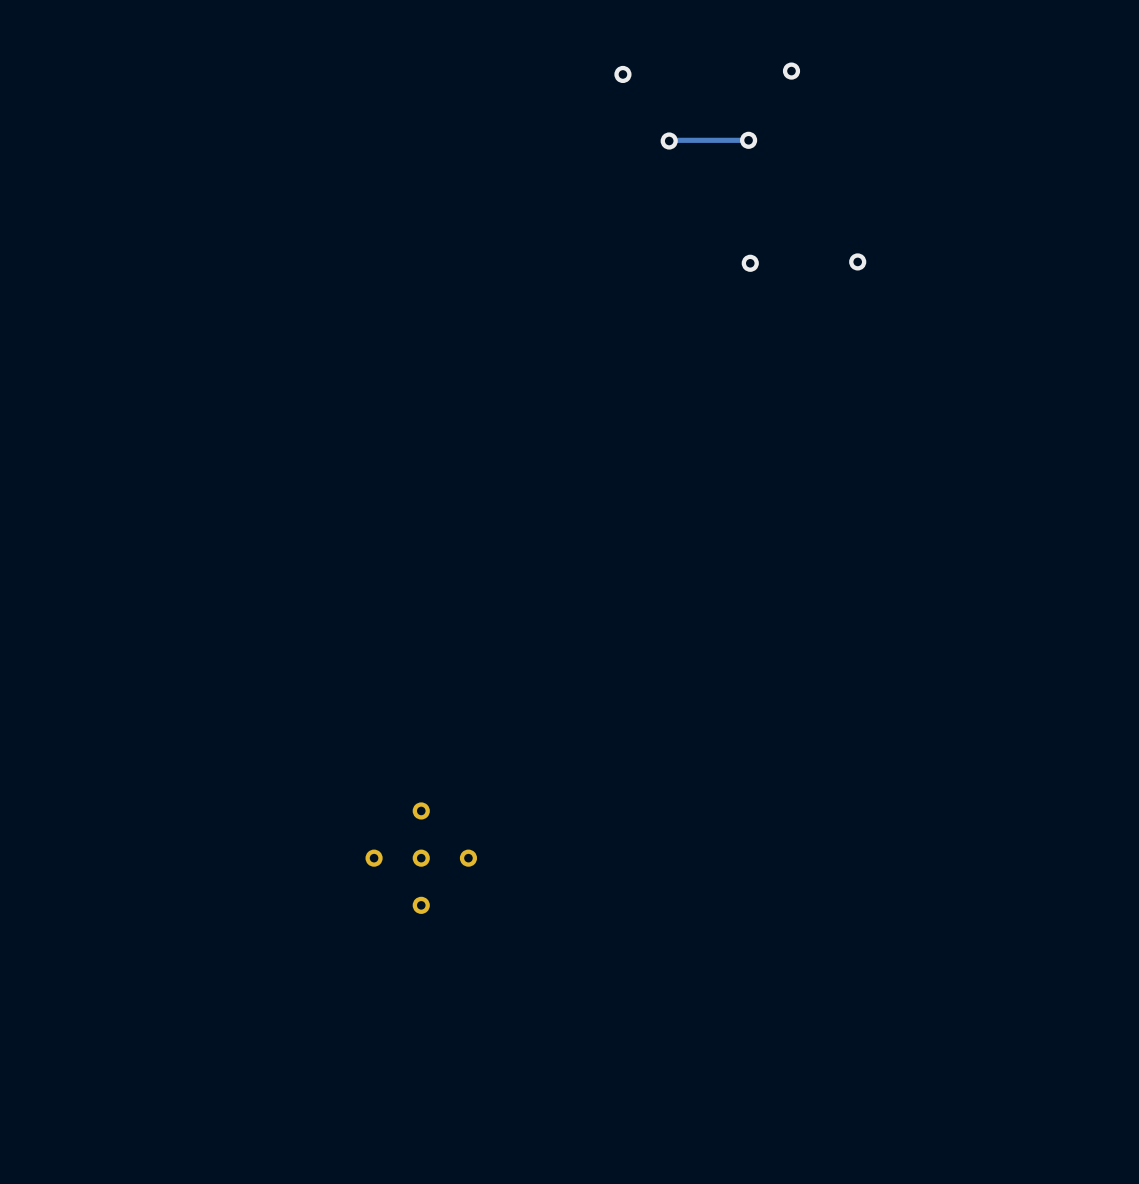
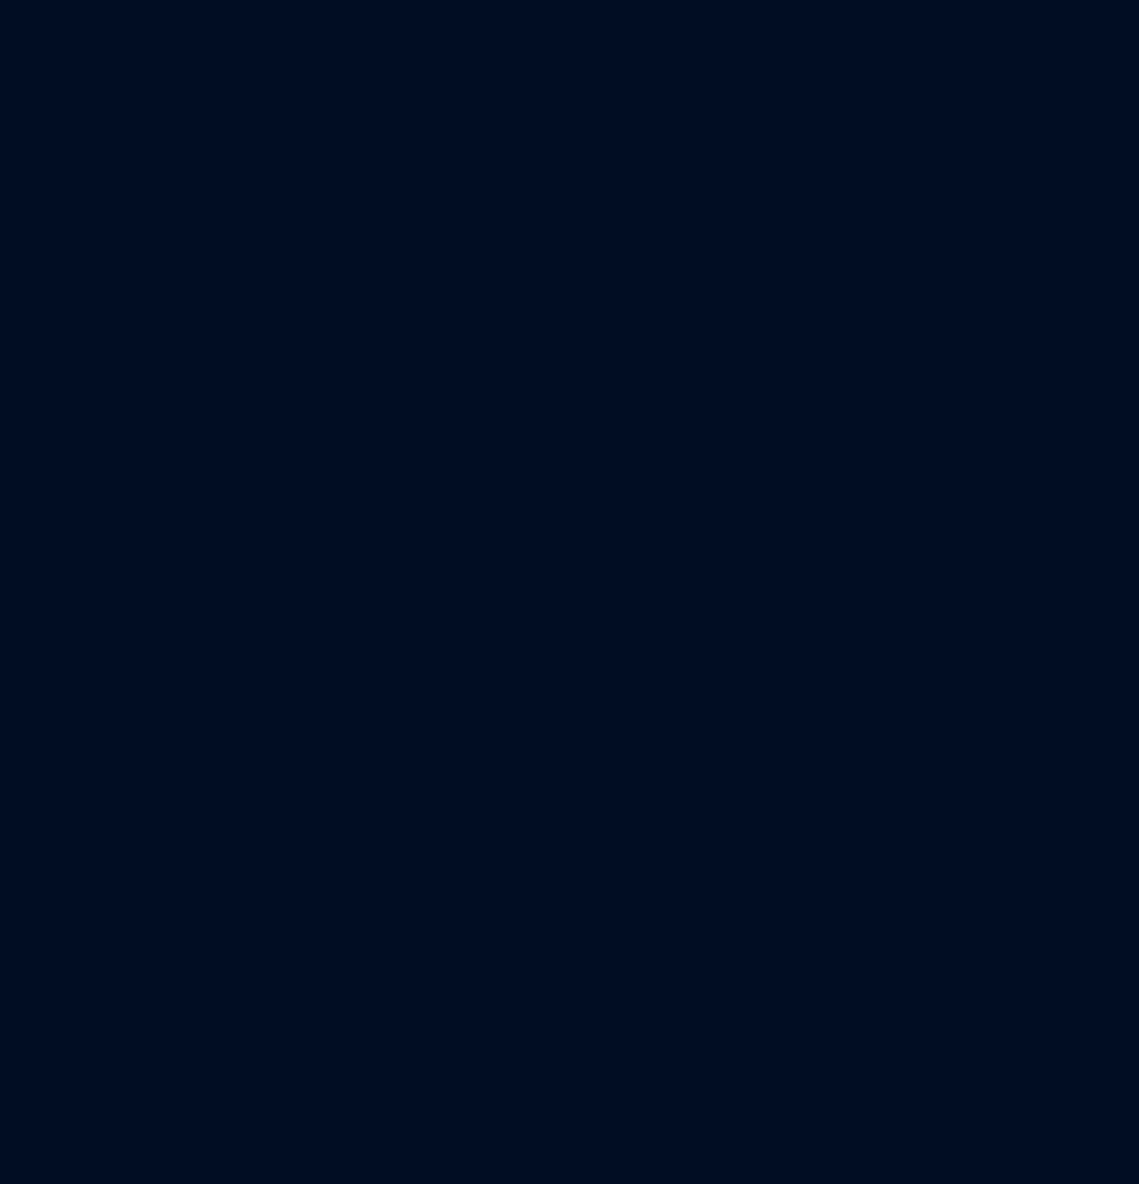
via: (791, 71) -> none
via: (622, 74) -> none
track: (748, 140) (669, 141) -> none
via: (748, 140) -> none
via: (669, 141) -> none
via: (857, 261) -> none
via: (750, 263) -> none
part: (421, 858) -> none

